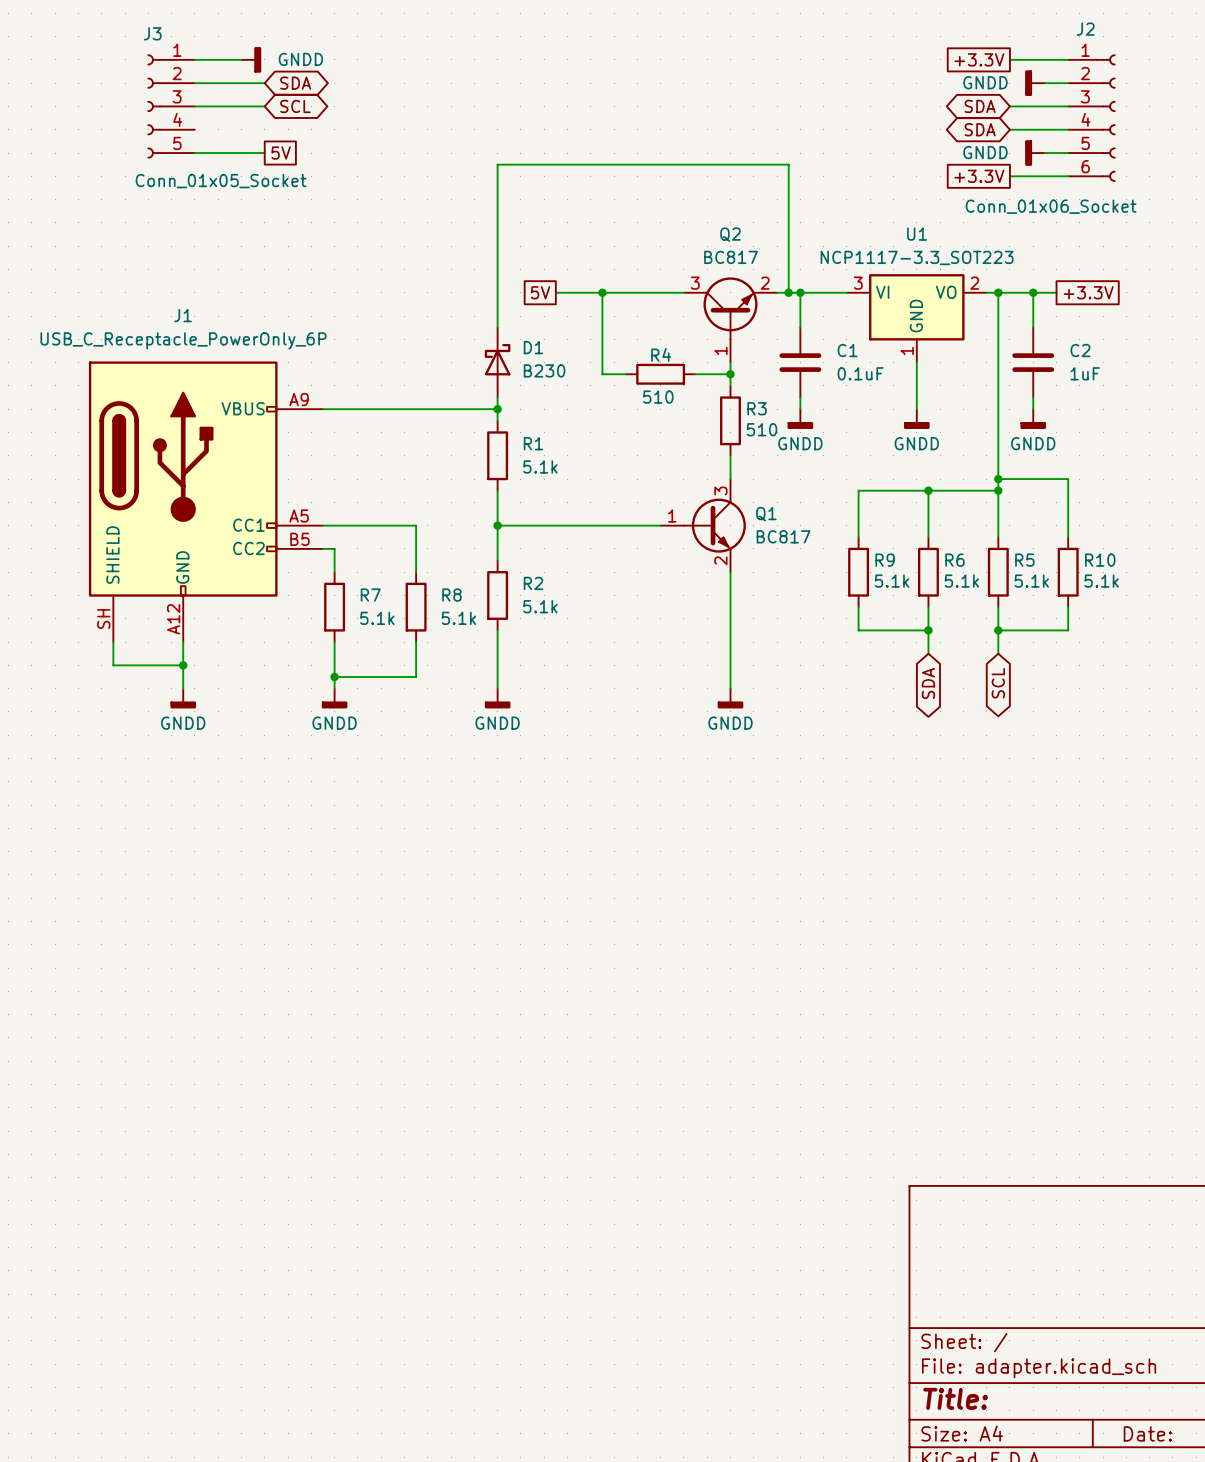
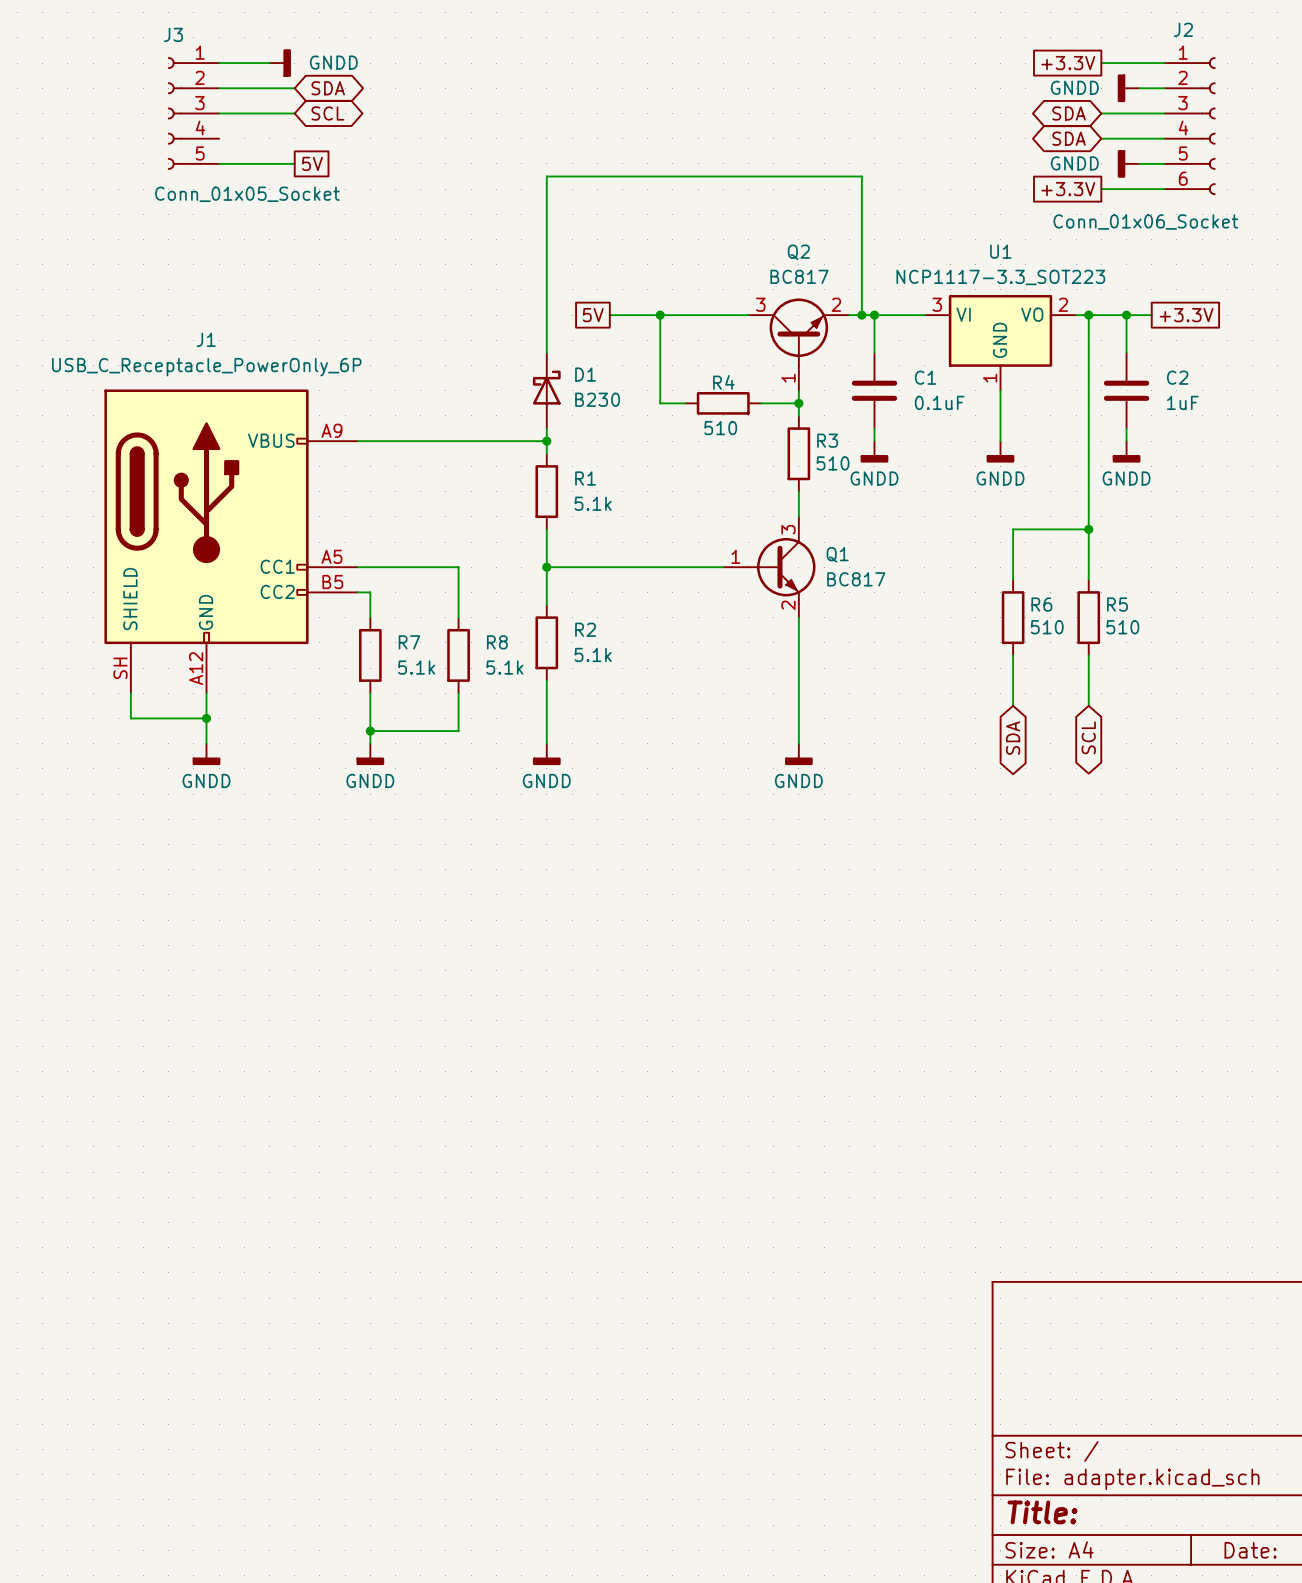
wire: (998, 479) (1068, 479) (1068, 537) -> none
junction: (998, 479) -> none
wire: (928, 490) (858, 490) (858, 537) -> none
junction: (928, 490) -> none
R9: 5.1k (858, 572) -> none
R10: 5.1k (1068, 572) -> none
R6 value: 5.1k (961, 581) -> 510 (1047, 627)
R5 value: 5.1k (1031, 581) -> 510 (1122, 627)
wire: (858, 607) (858, 630) (928, 630) -> none
wire: (1068, 607) (1068, 630) (998, 630) -> none
junction: (928, 630) -> none
junction: (998, 630) -> none

